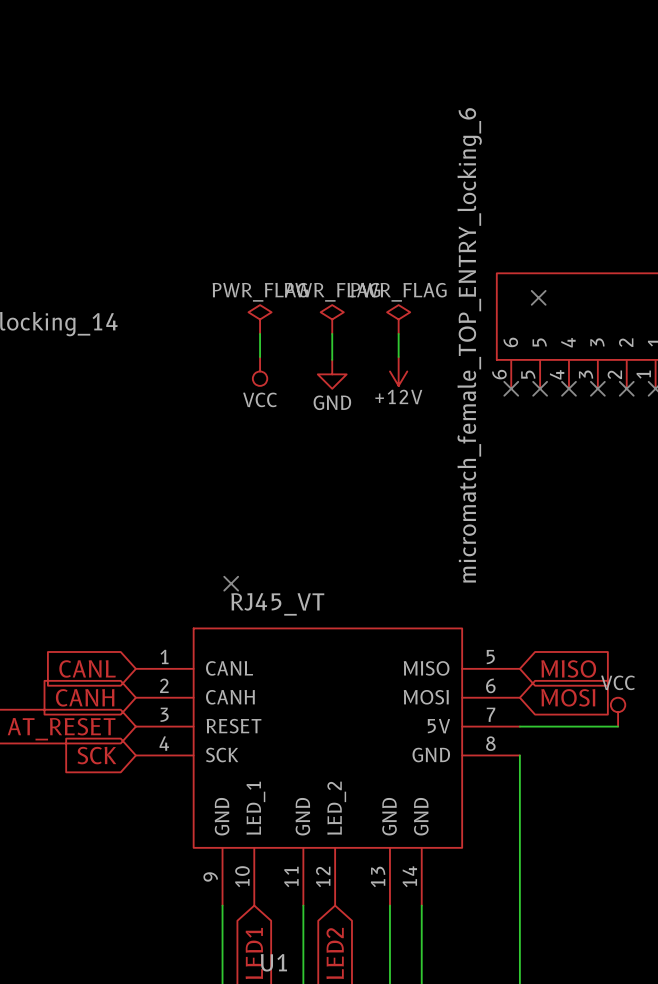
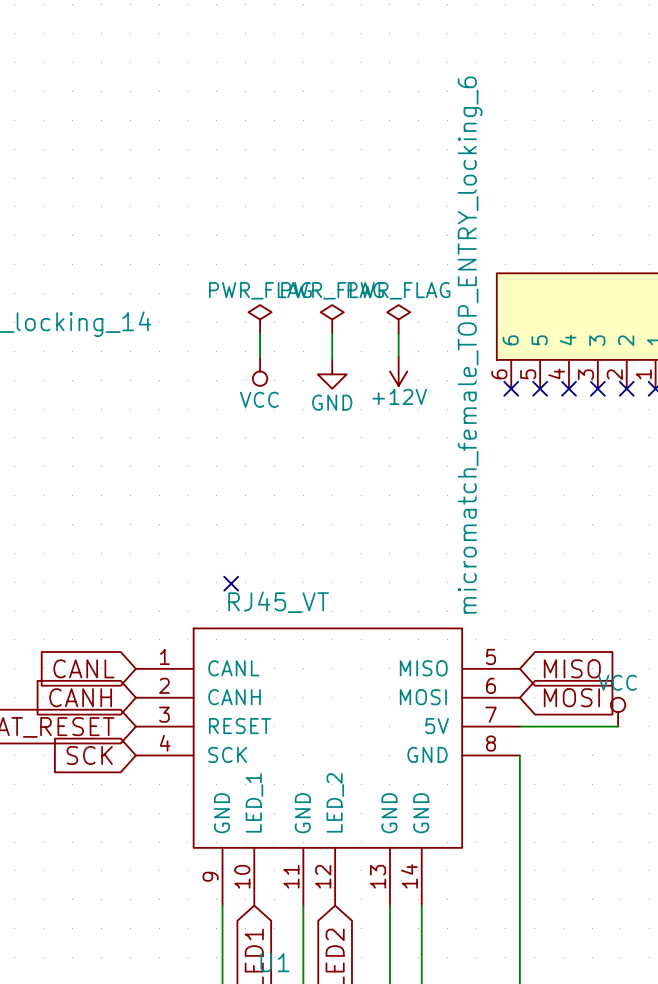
no-connect mark: (538, 297) -> none

